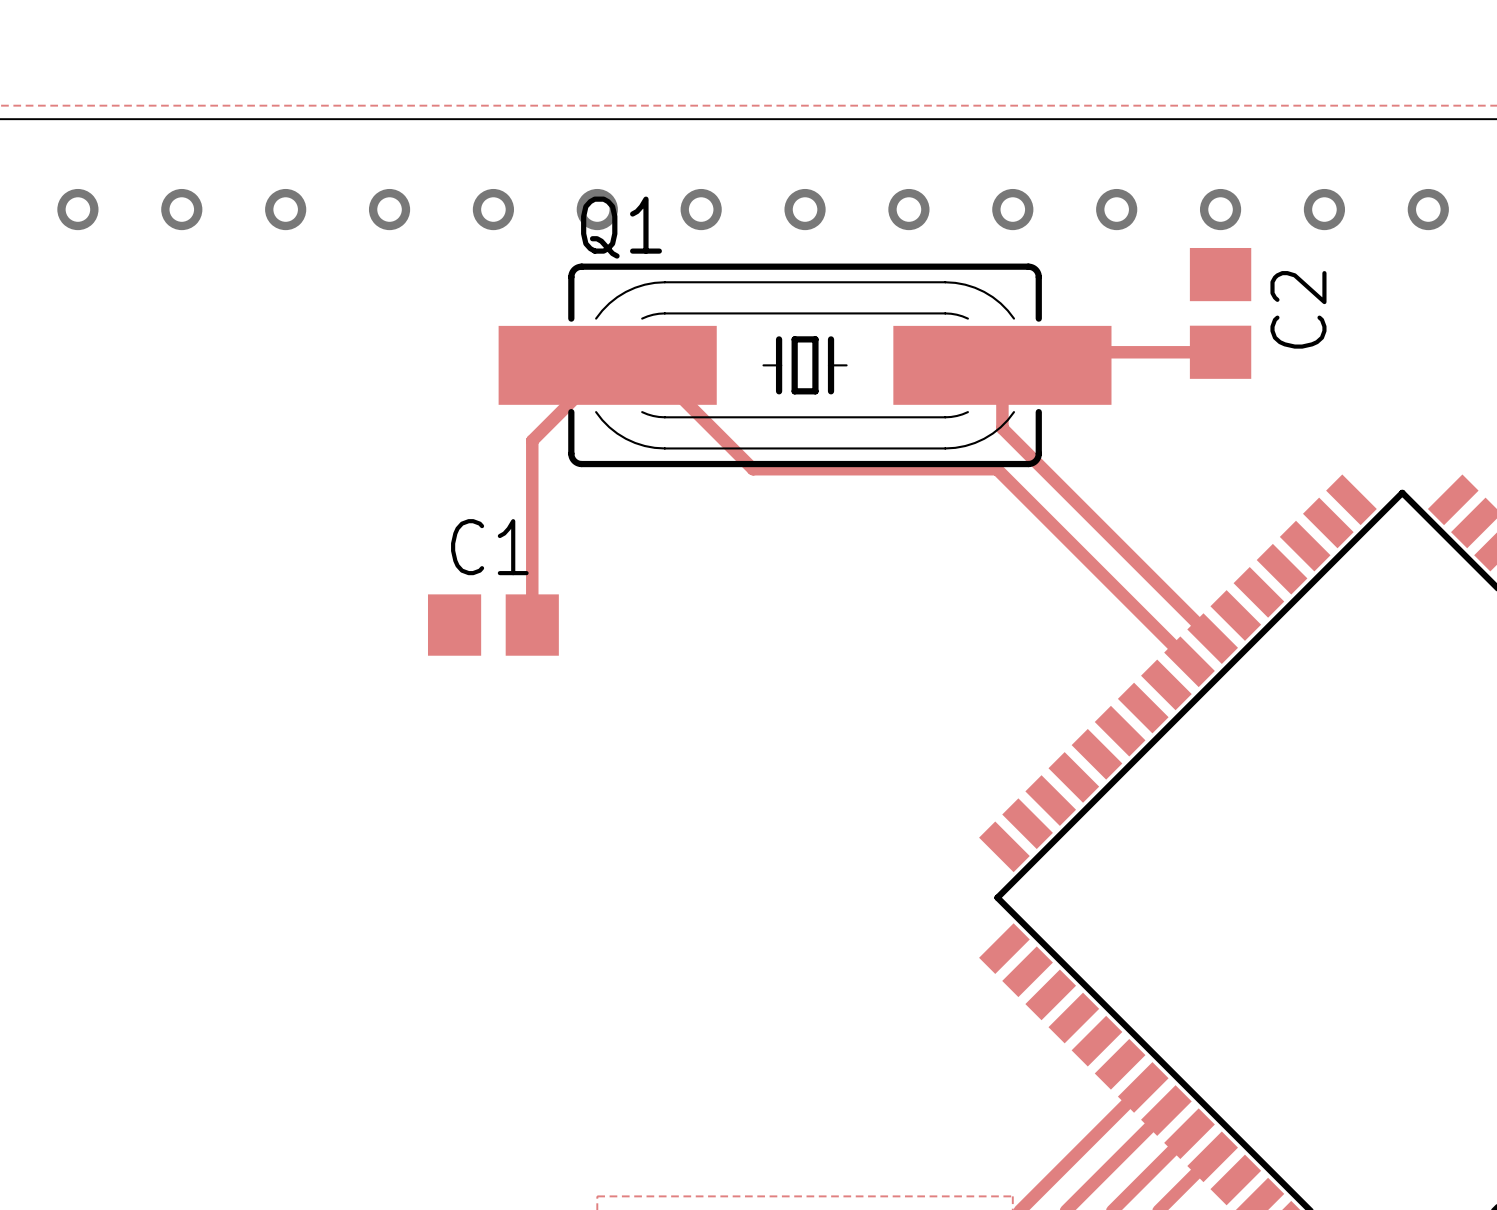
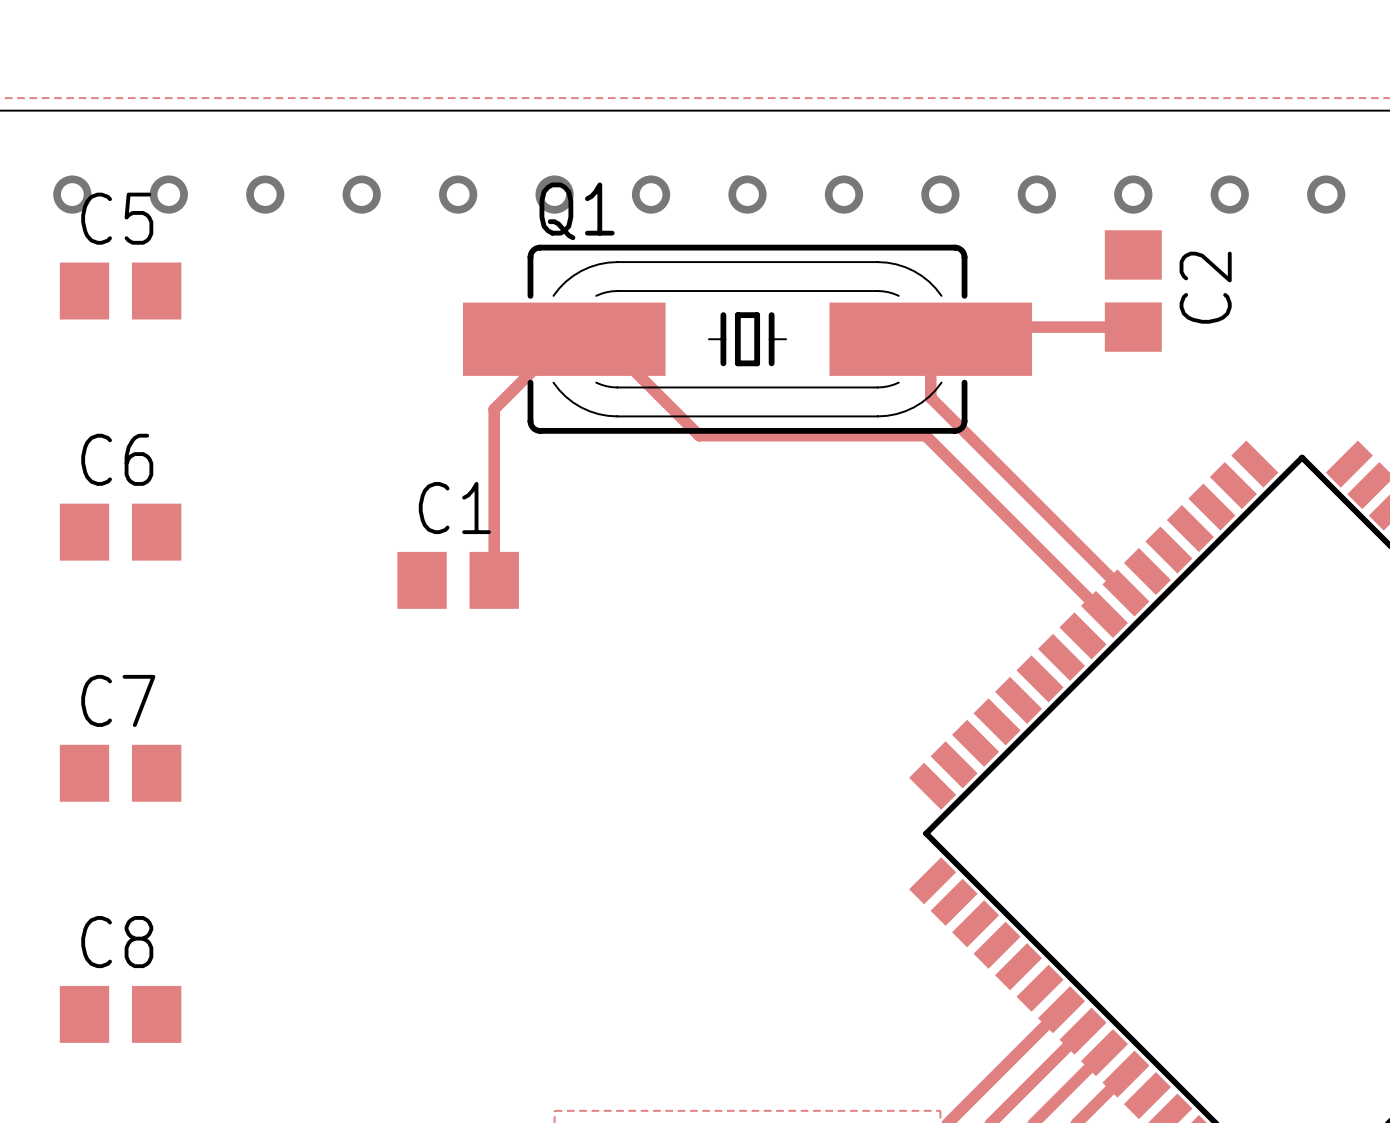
C5: none -> (120, 291)
C6: none -> (120, 532)
C7: none -> (120, 773)
C8: none -> (120, 1014)

